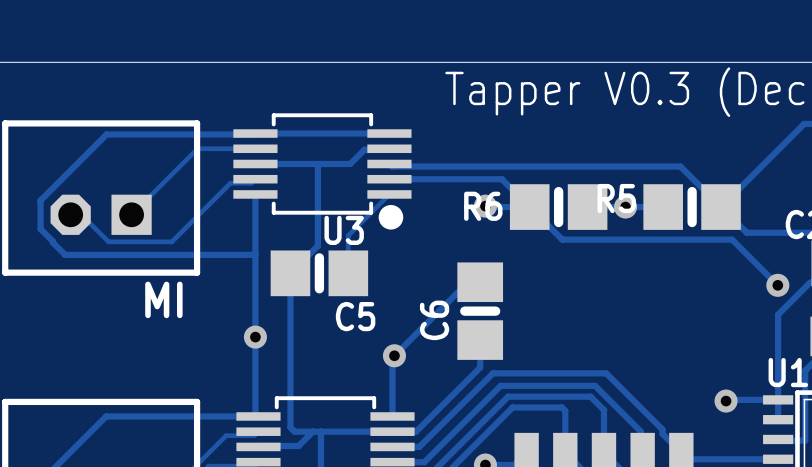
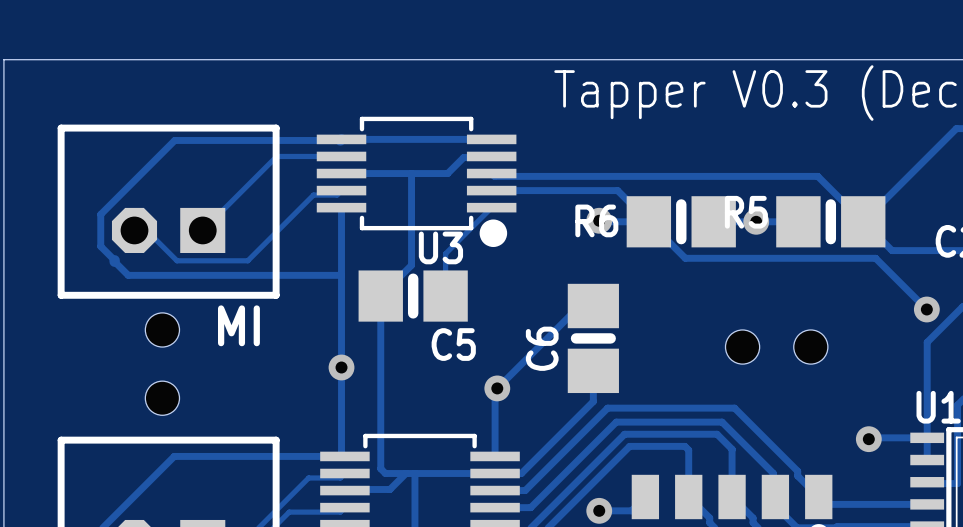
hole: none -> (162, 329)
hole: none -> (742, 347)
hole: none -> (810, 347)
hole: none -> (162, 398)

